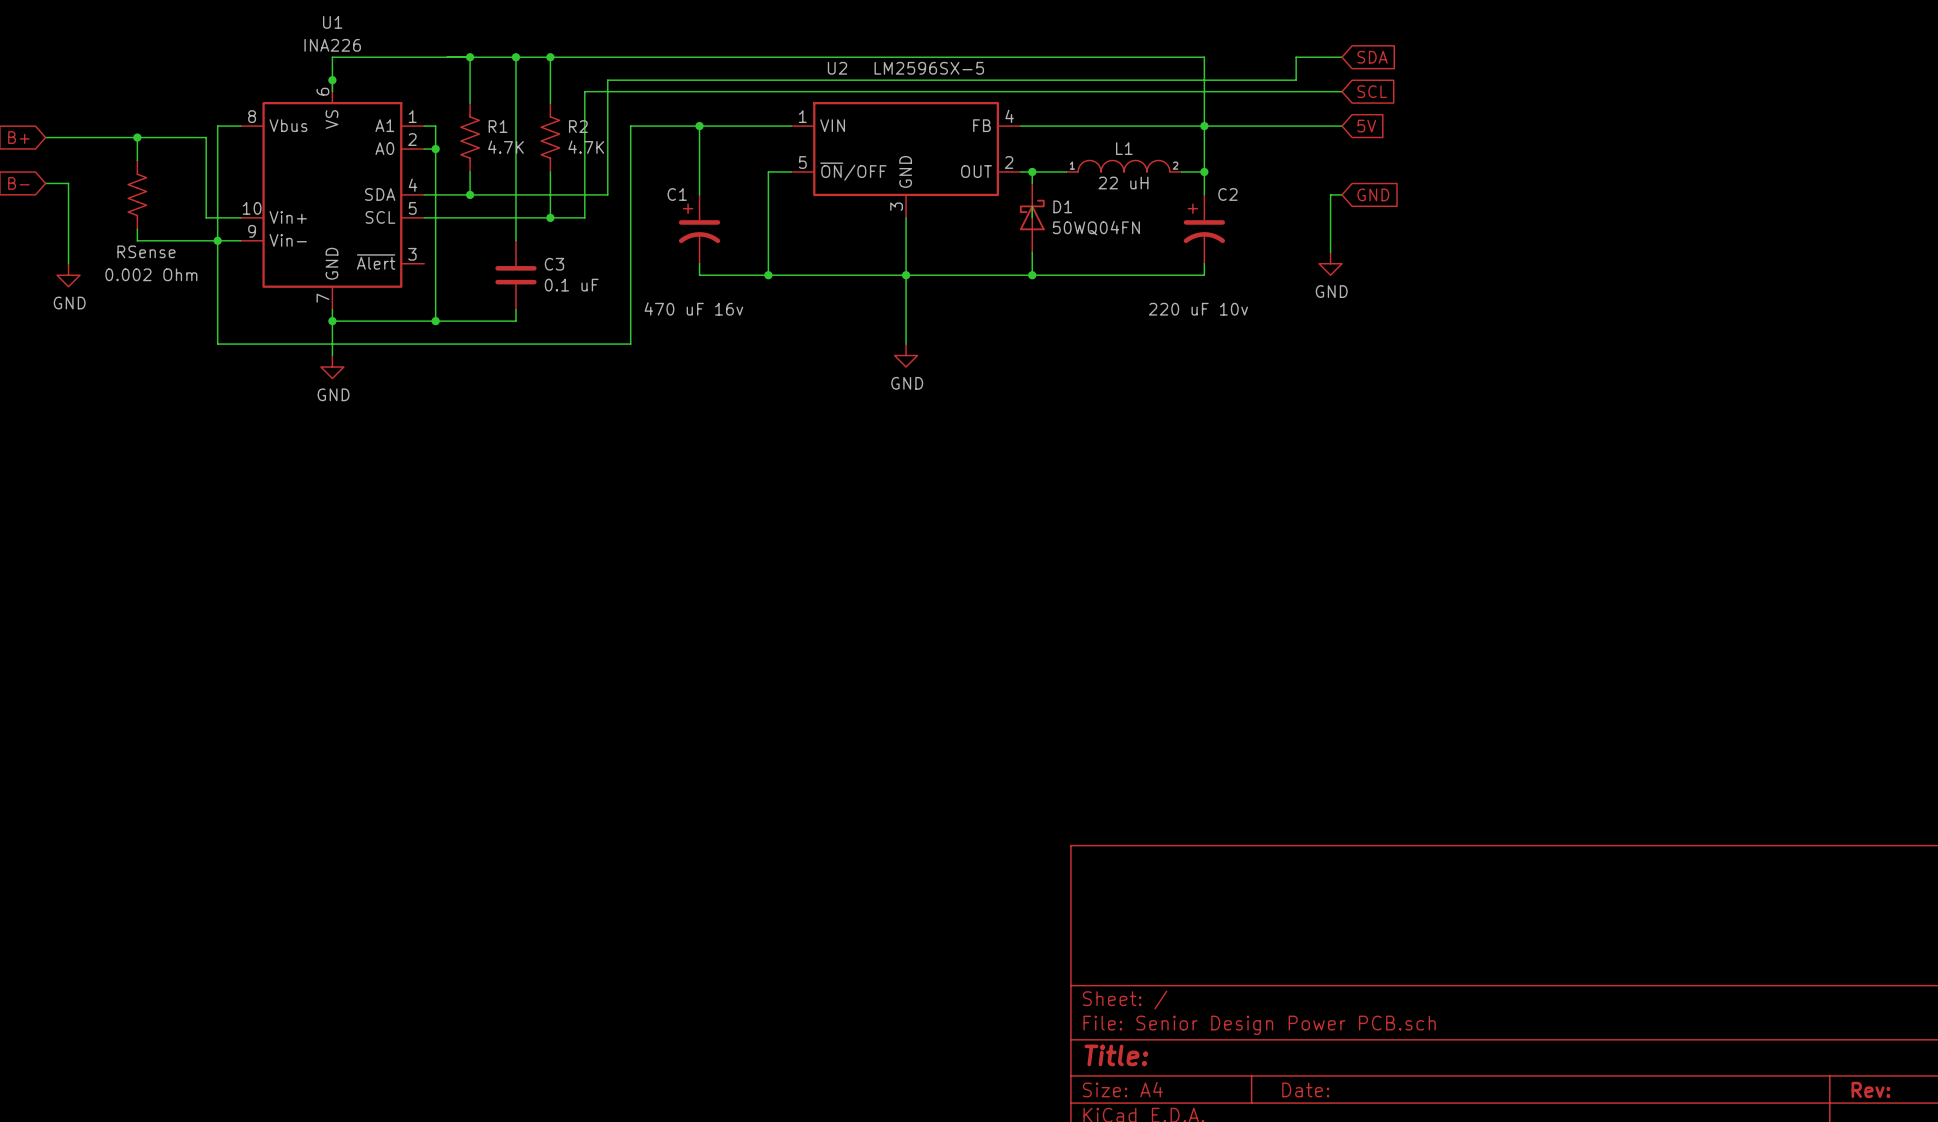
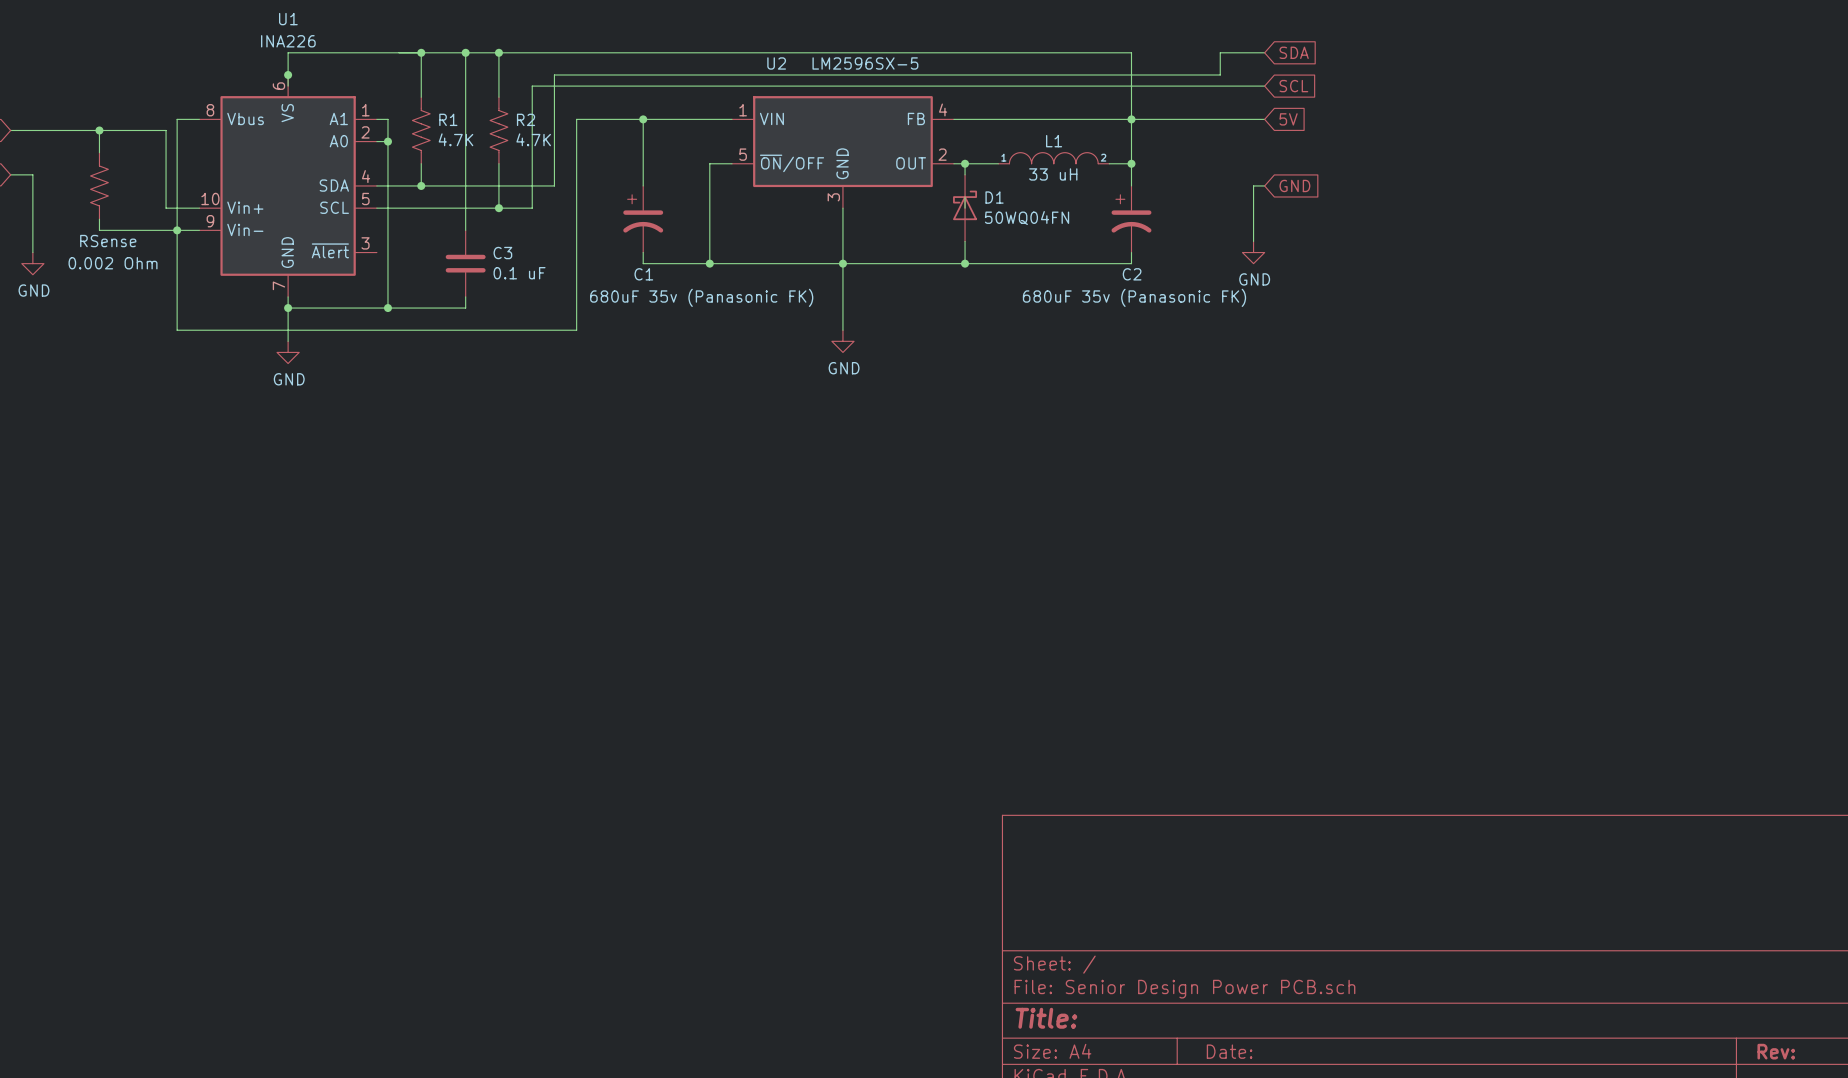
L1 value: 22 uH (1123, 183) -> 33 uH (1053, 174)
C1 name position: C1 (677, 194) -> C1 (643, 274)
C2 name position: C2 (1227, 194) -> C2 (1132, 274)
C1 value: 470 uF 16v (693, 308) -> 680uF 35v (Panasonic FK) (701, 297)
C2 value: 220 uF 10v (1198, 309) -> 680uF 35v (Panasonic FK) (1134, 297)

